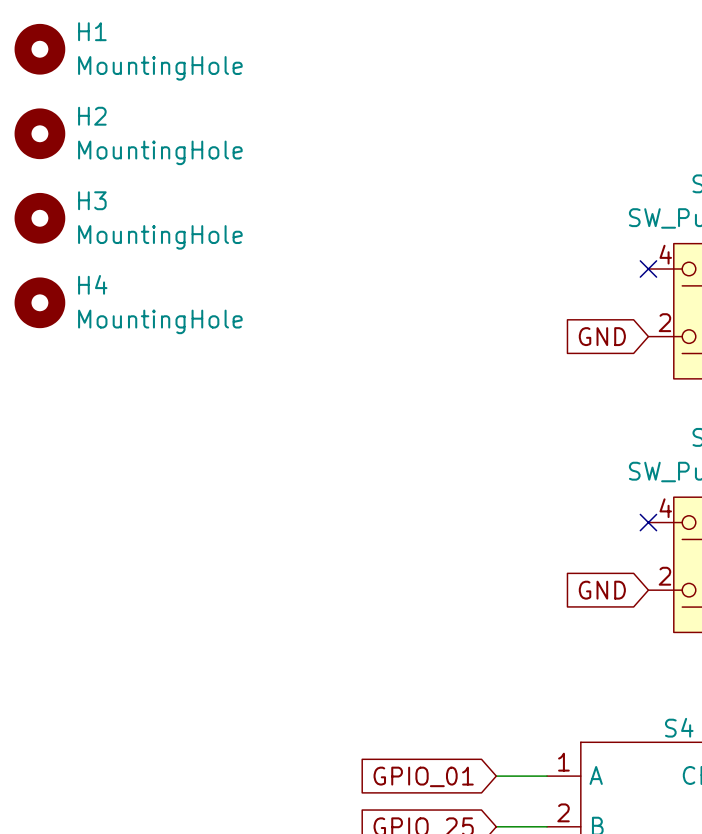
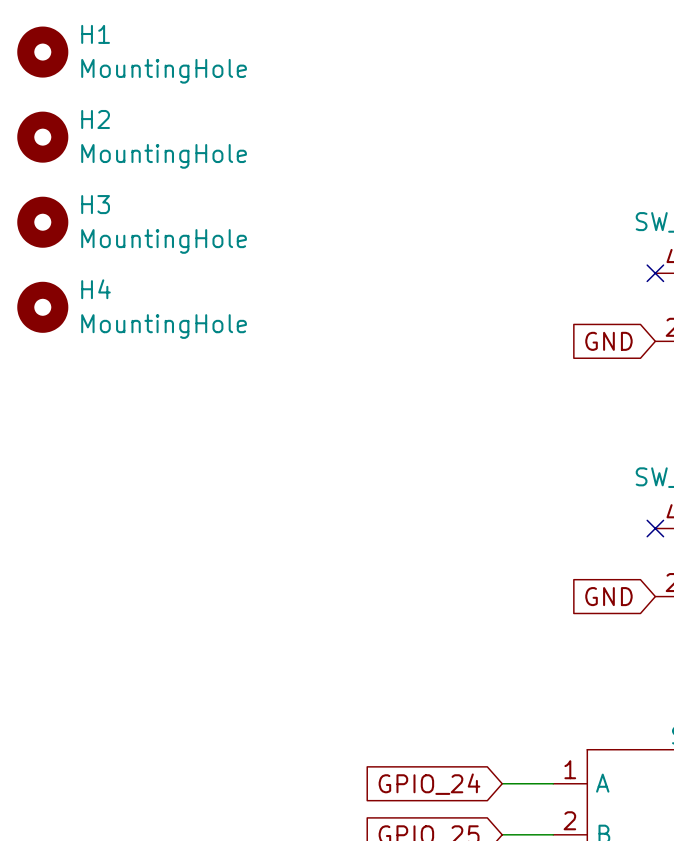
global label: GPIO_01 (423, 776) -> GPIO_24 (429, 784)

